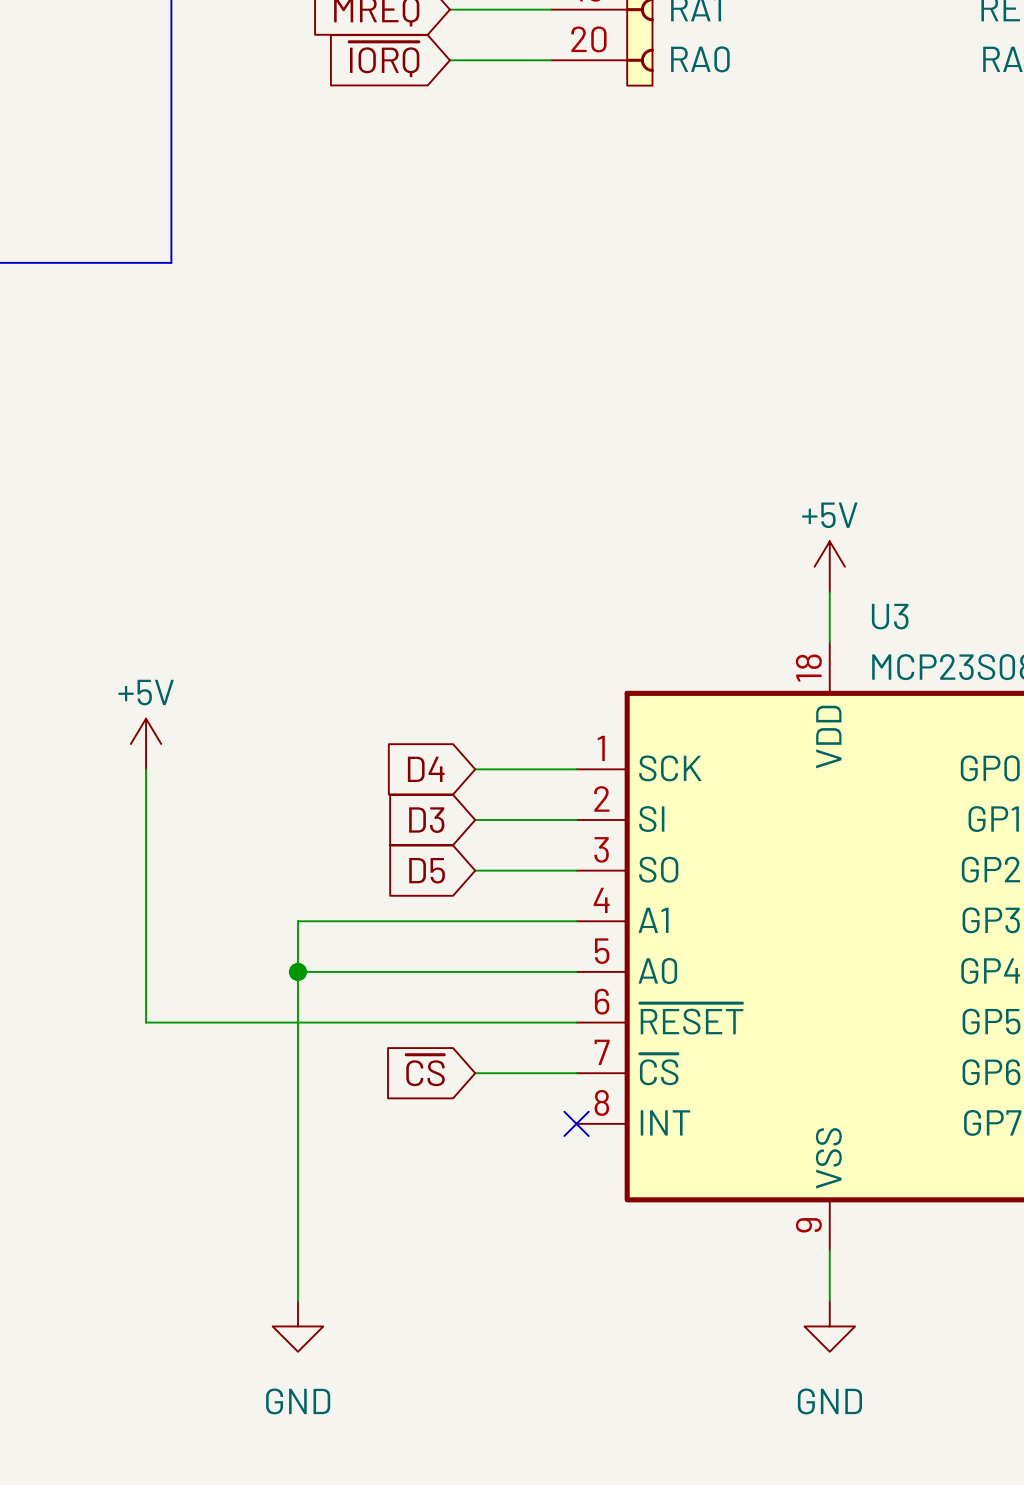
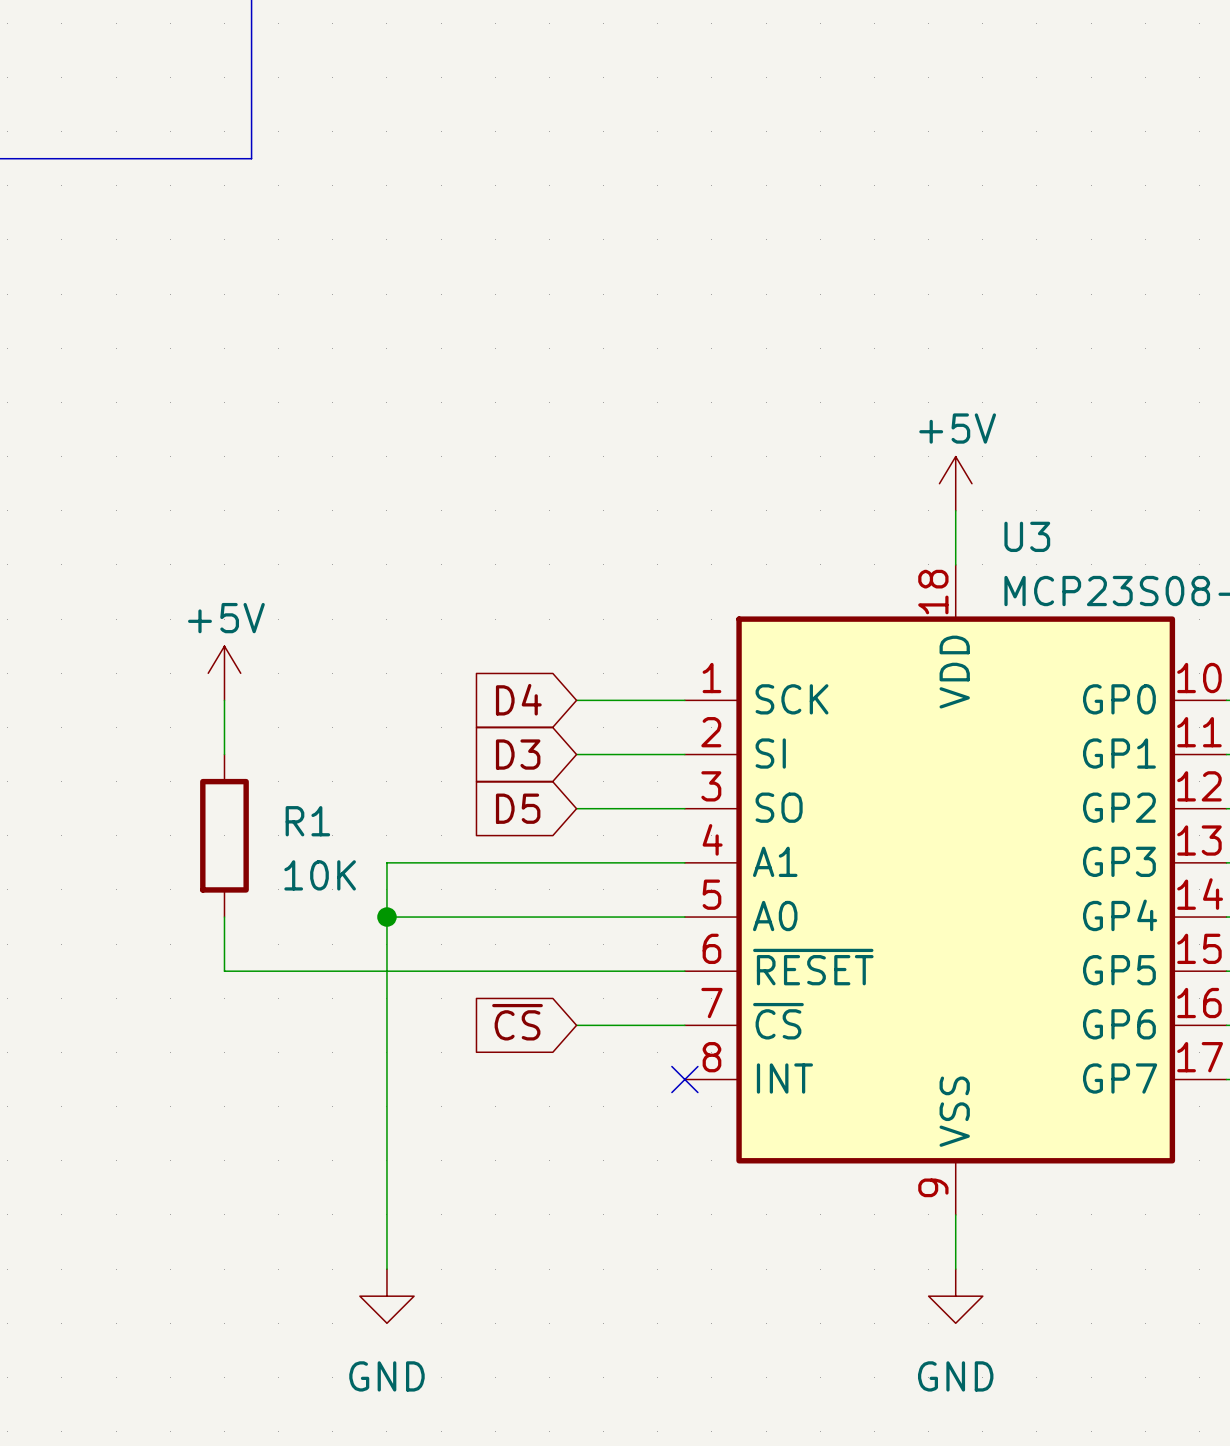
wire: (146, 819) (146, 971) -> none
R1: none -> 10K (224, 835)

